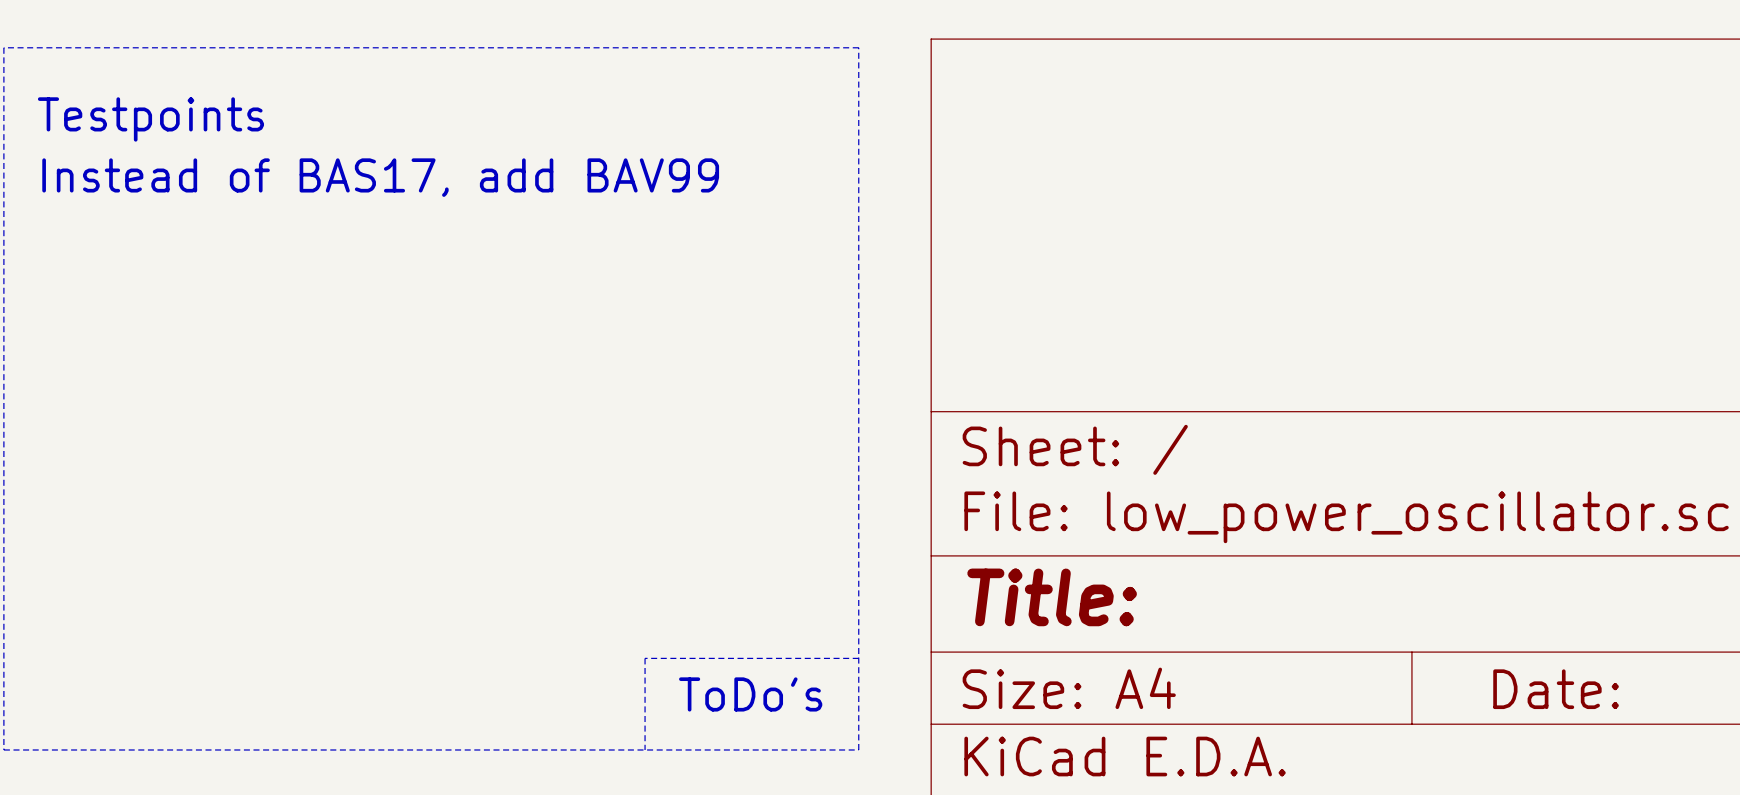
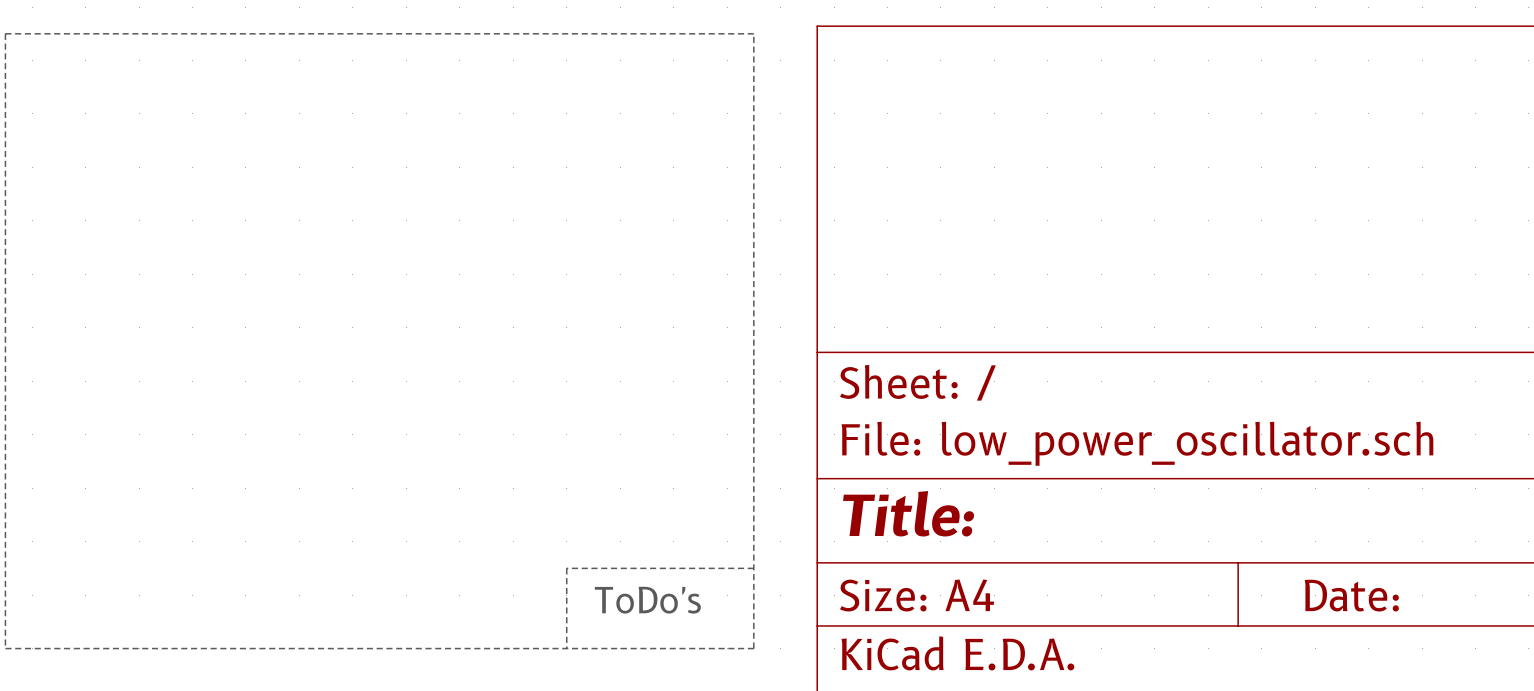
text: Testpoints (150, 119) -> none
text: Instead of BAS17, add BAV99 (380, 177) -> none

